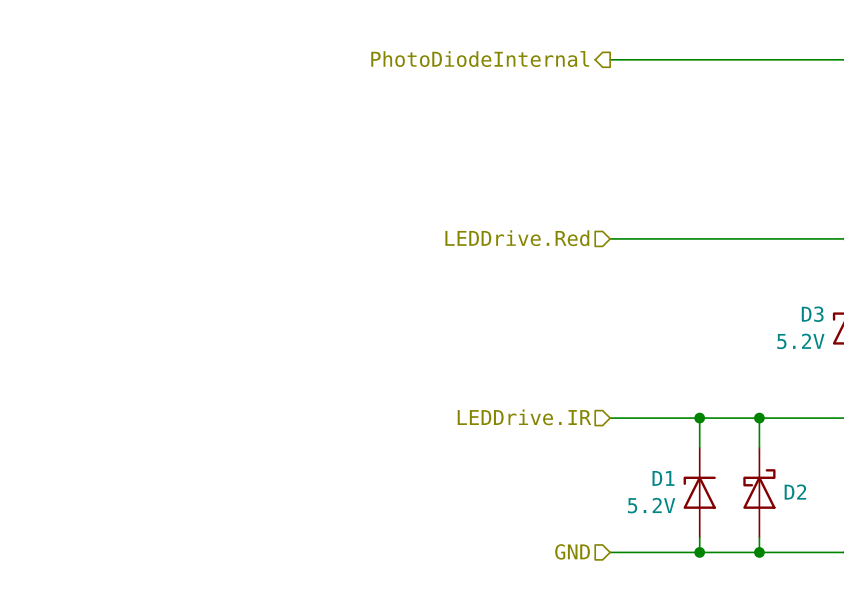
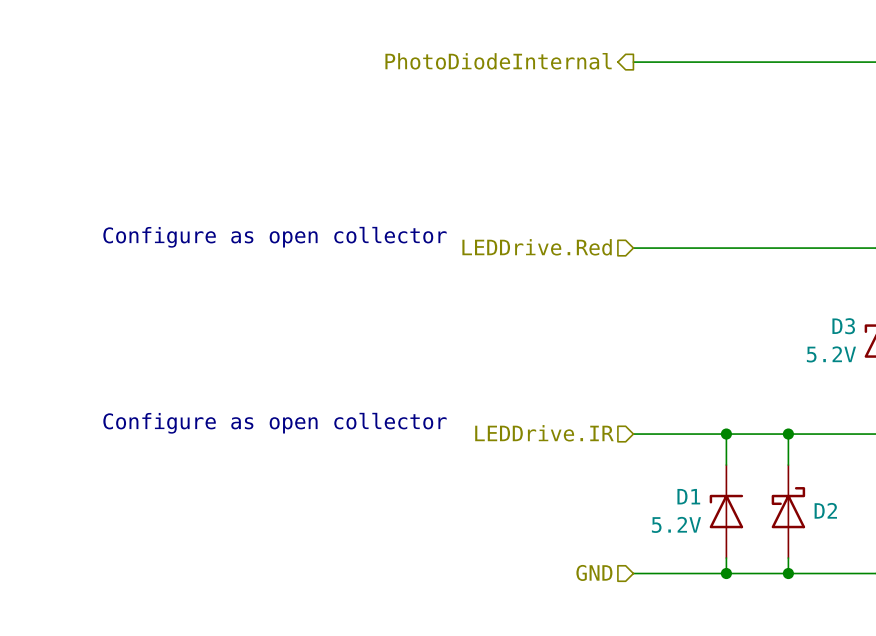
text: none -> Configure as open collector (274, 237)
text: none -> Configure as open collector (274, 423)

